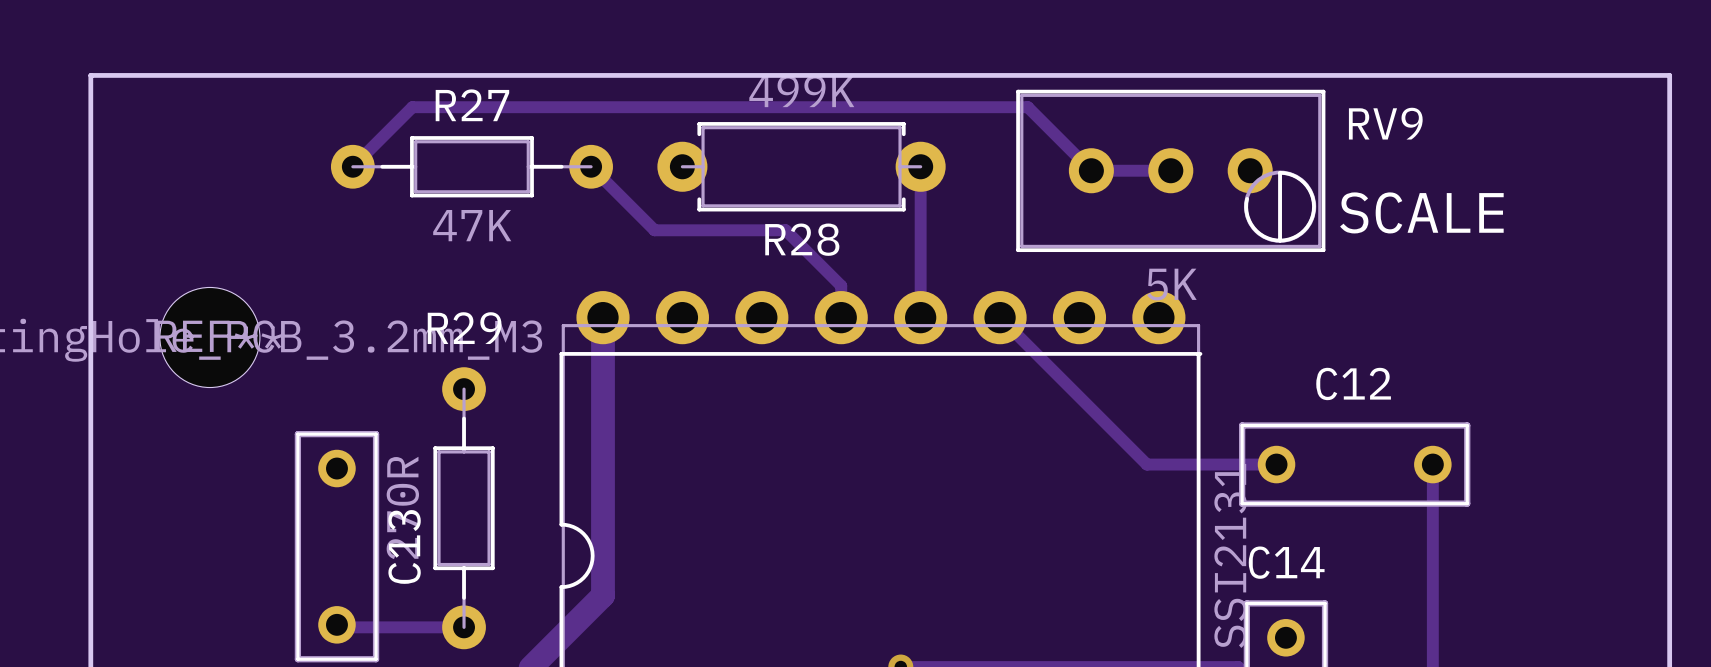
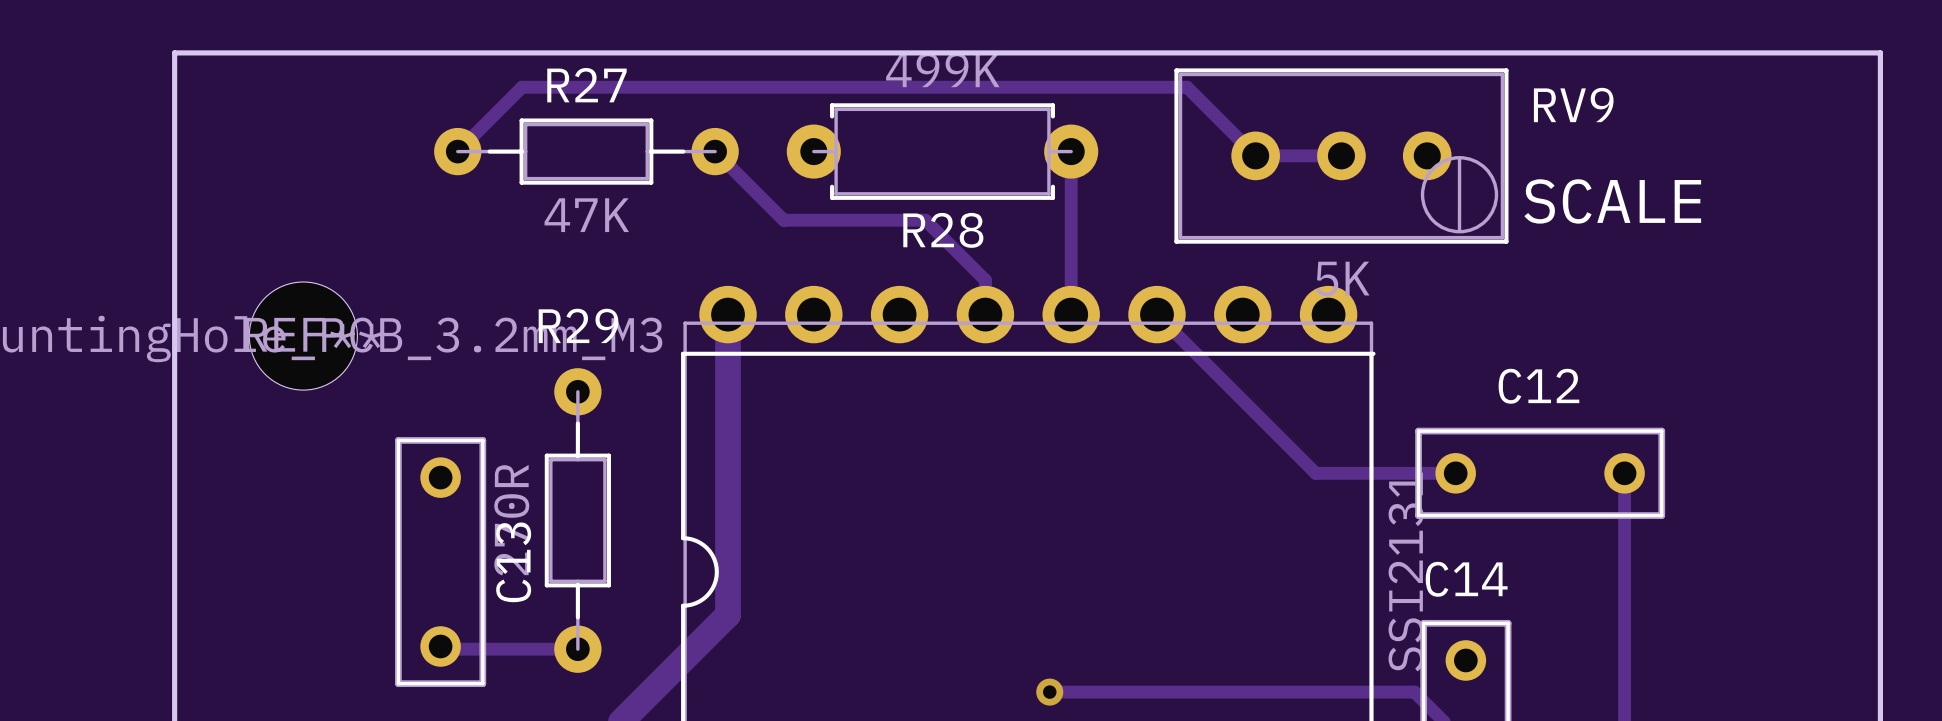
RV9 footprint: [1016, 89, 1326, 253] -> [1174, 68, 1509, 244]

